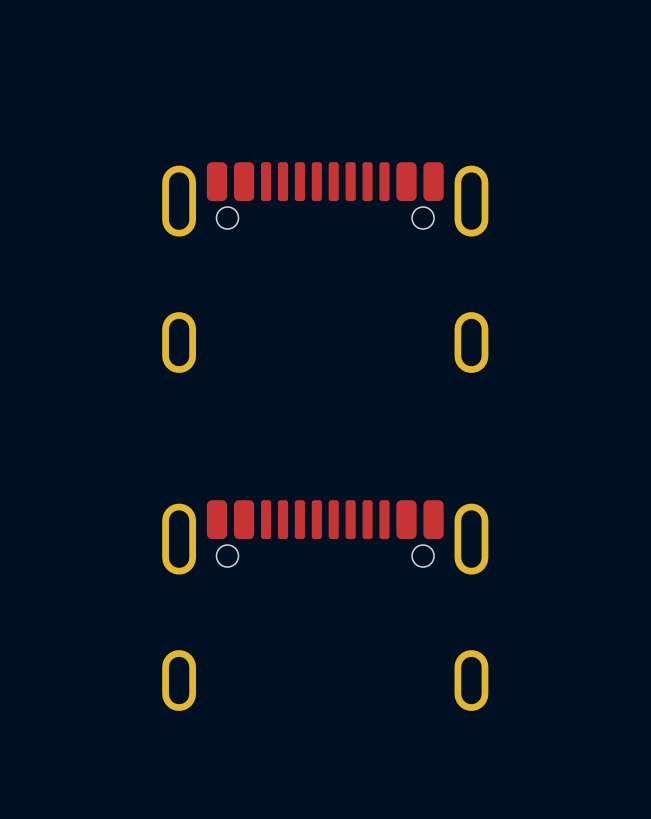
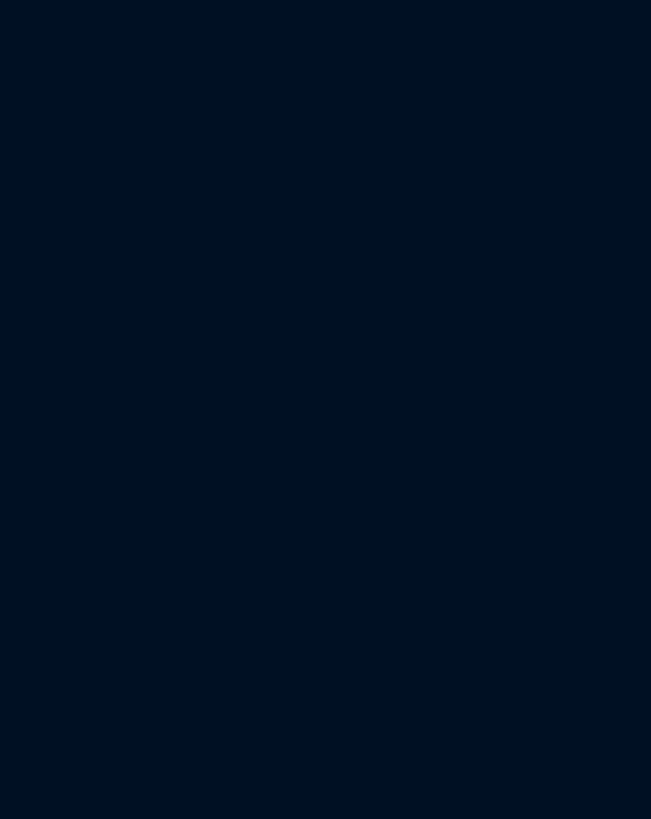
part: (325, 267) -> none
part: (325, 605) -> none

